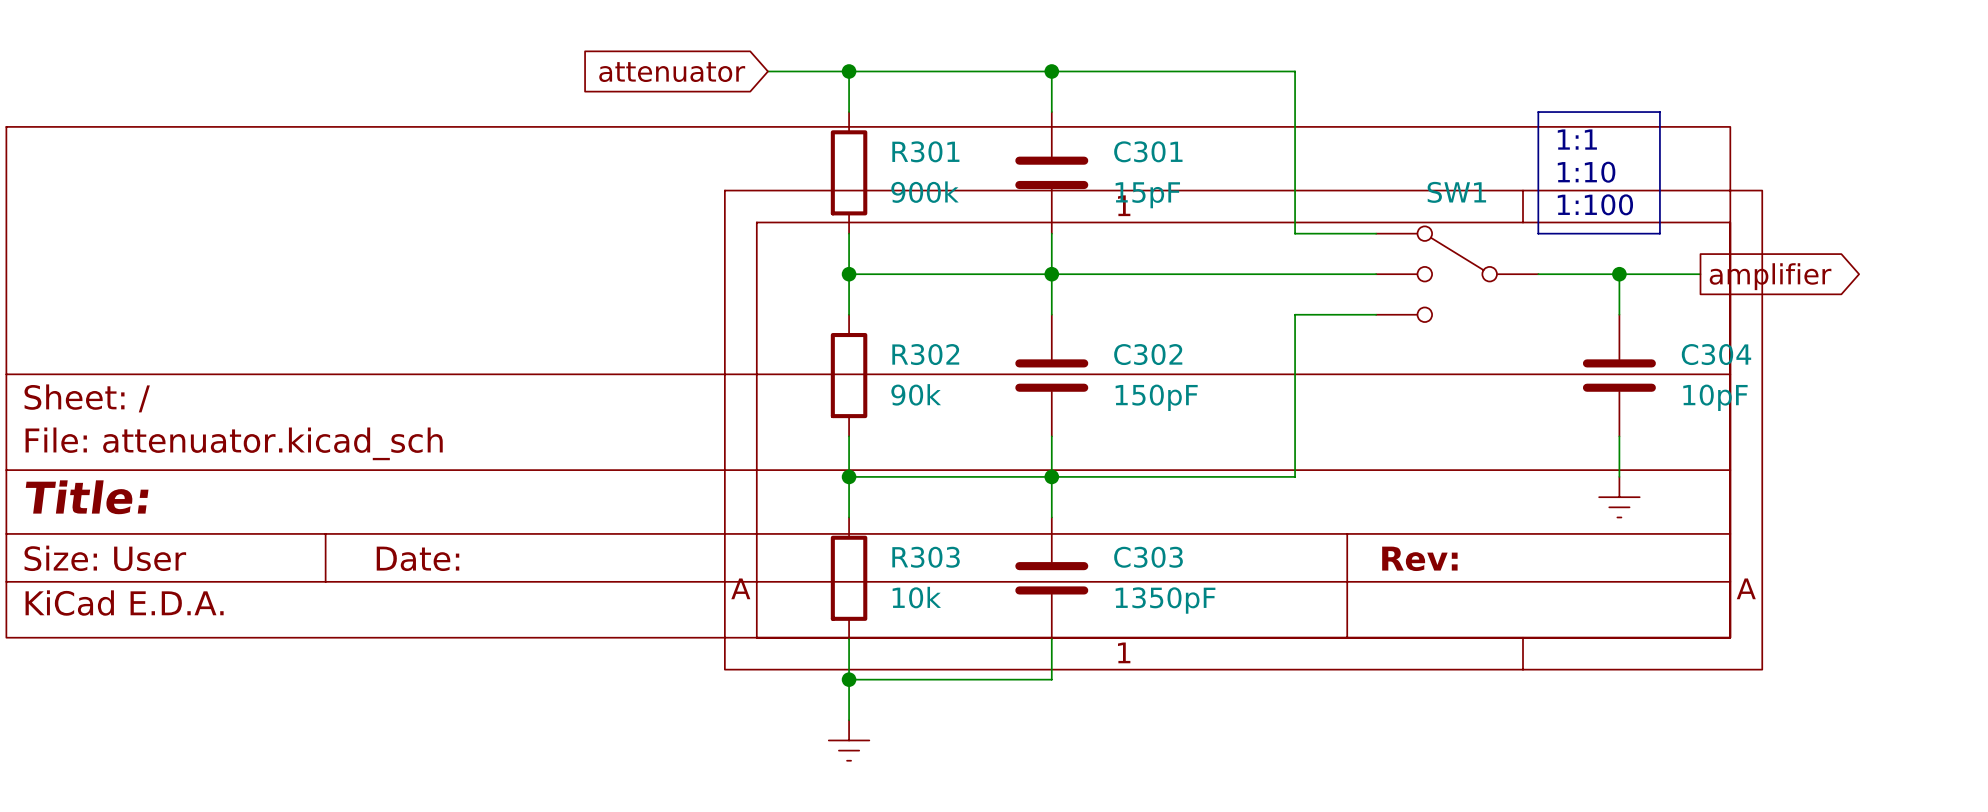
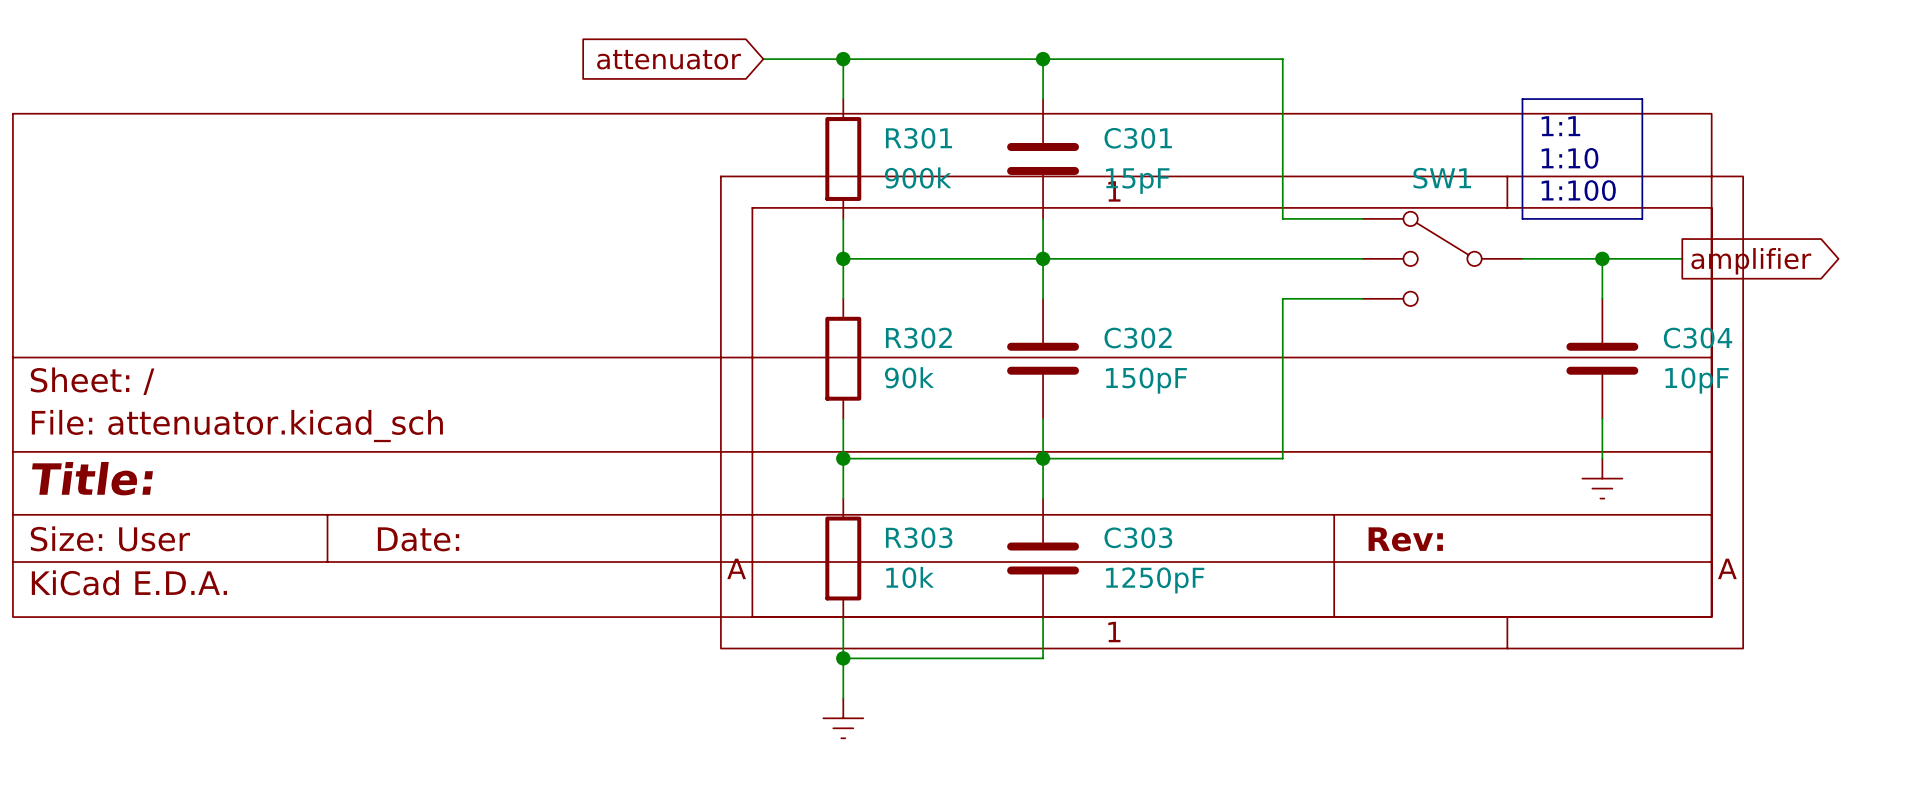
C303 value: 1350pF (1165, 600) -> 1250pF (1155, 580)

